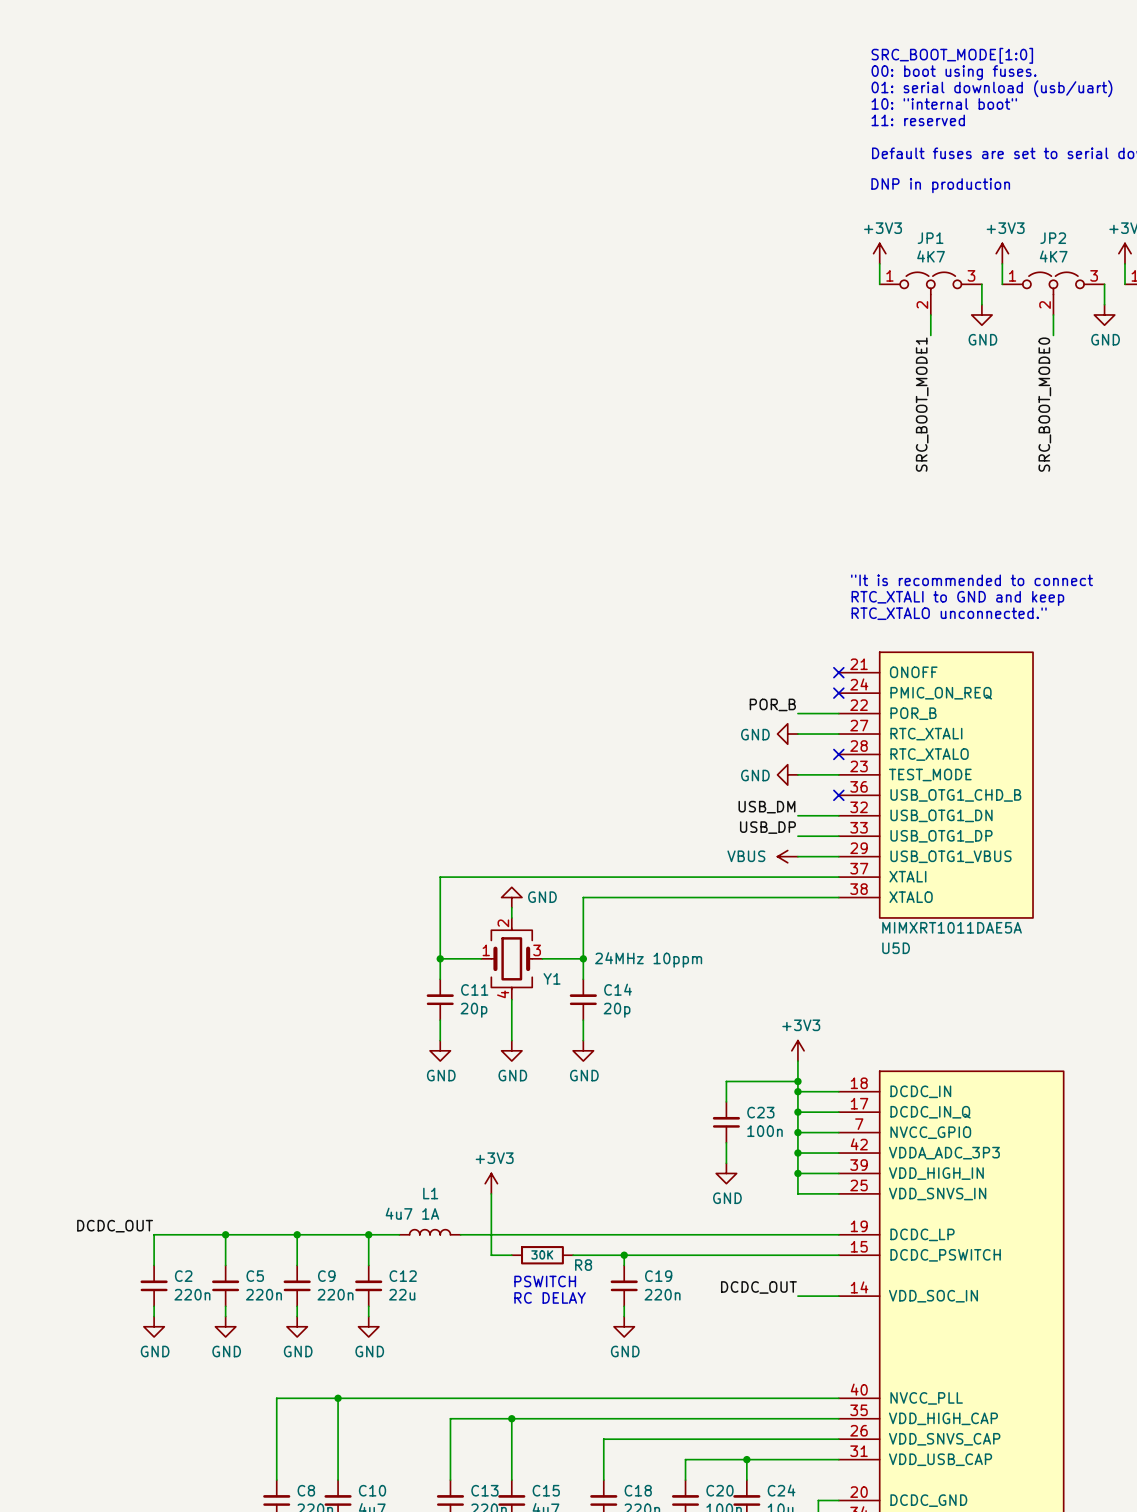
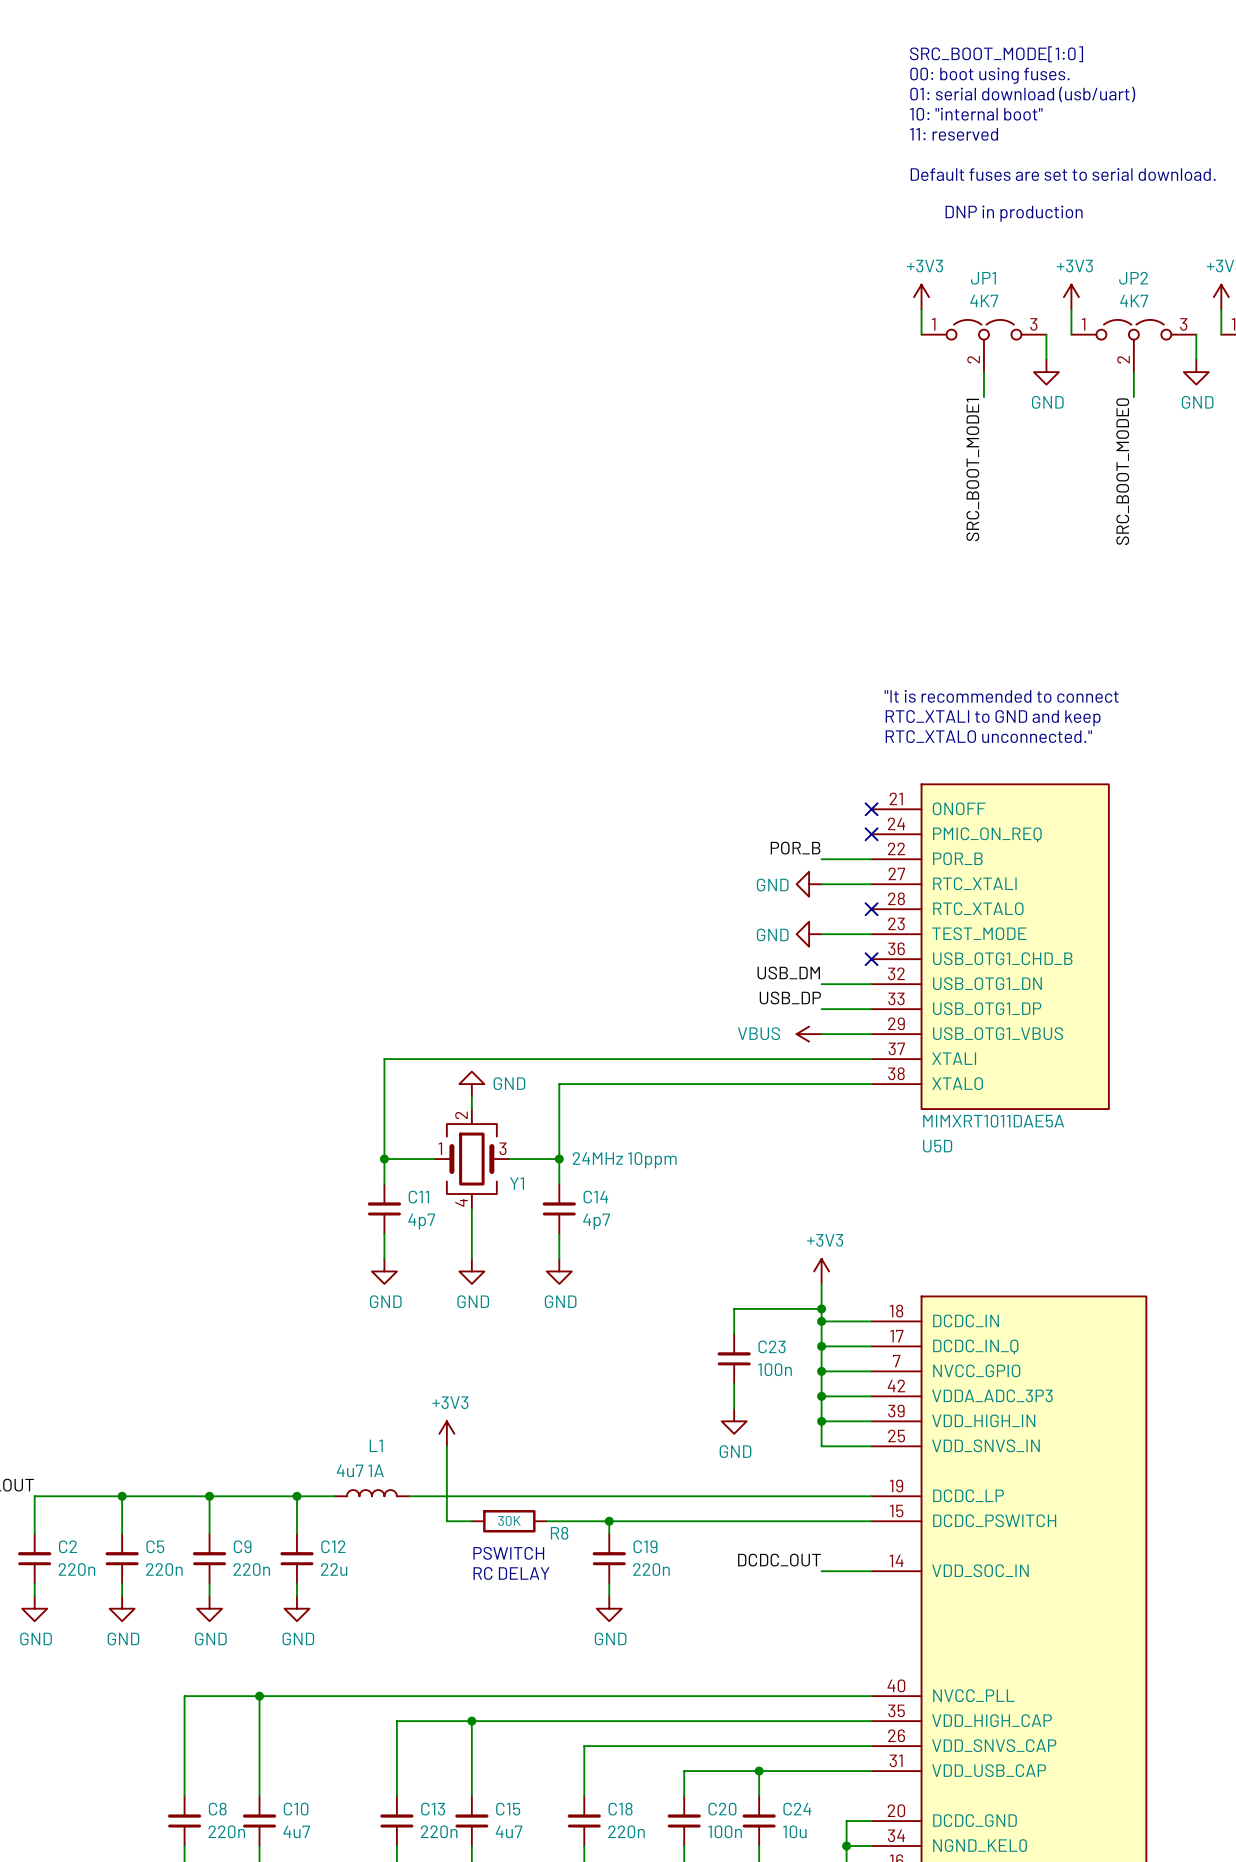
C11 value: 20p (473, 1010) -> 4p7 (421, 1221)
C14 value: 20p (617, 1010) -> 4p7 (596, 1221)

